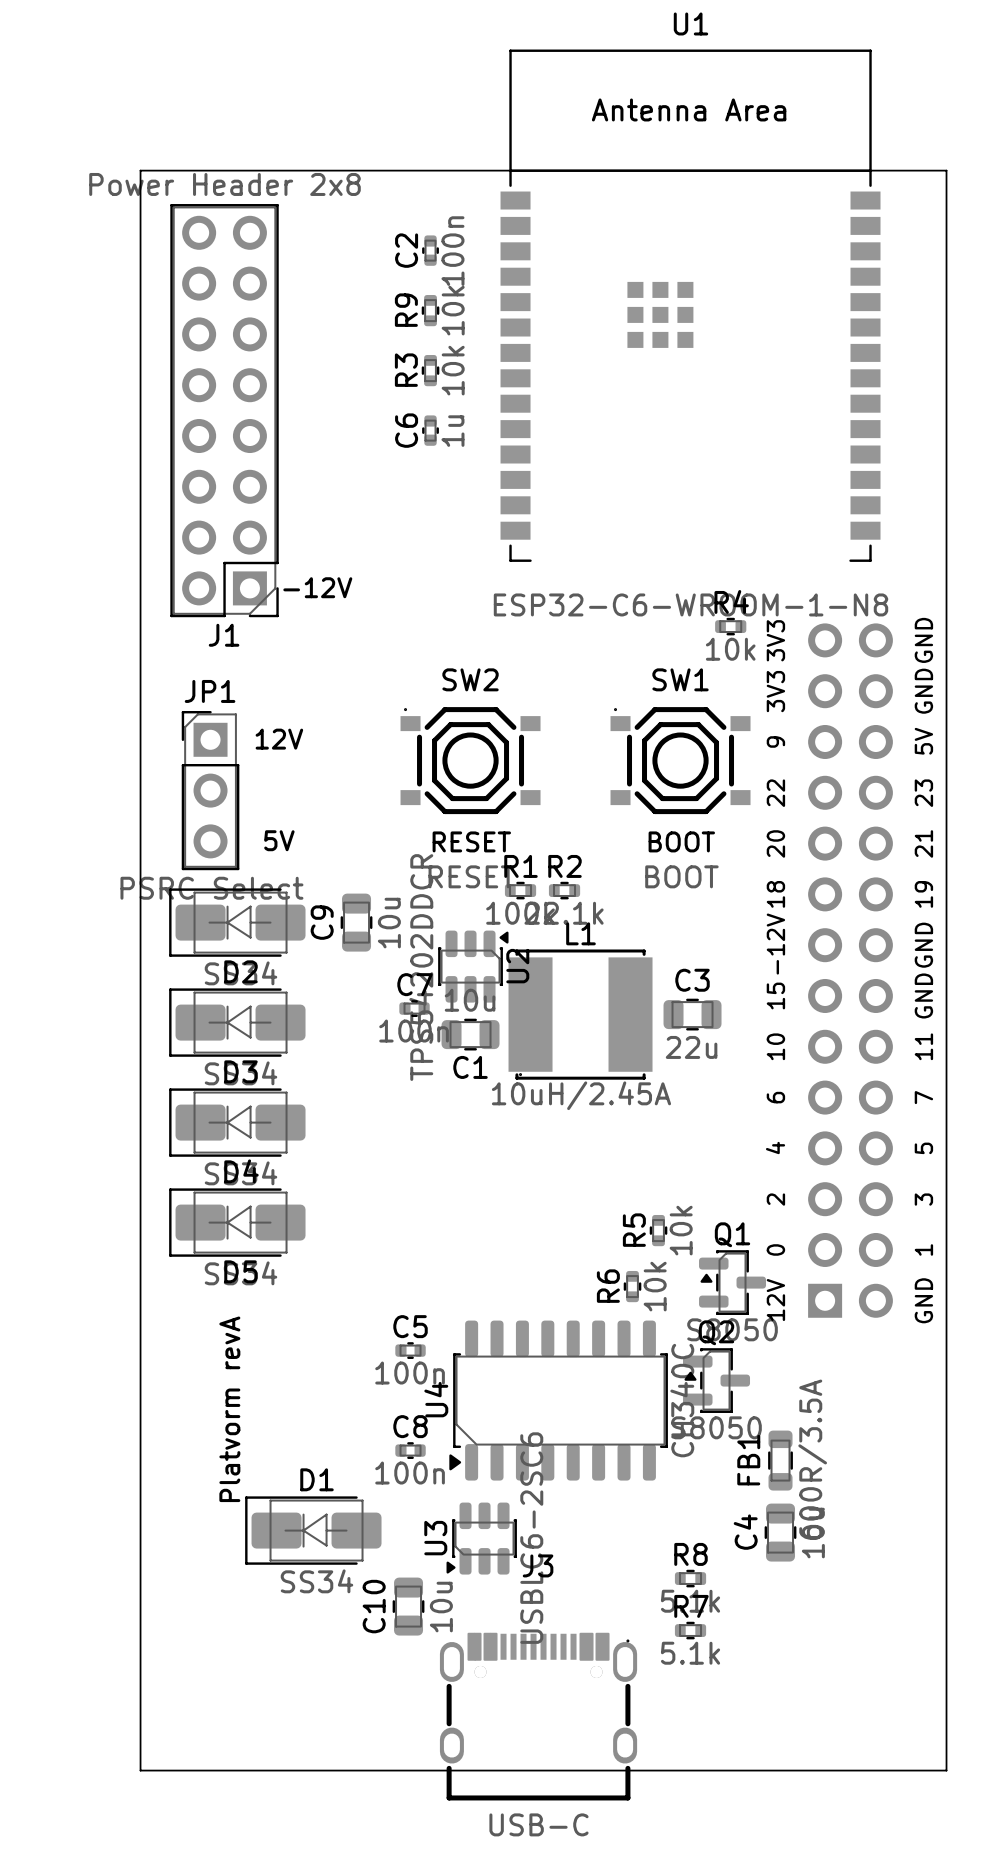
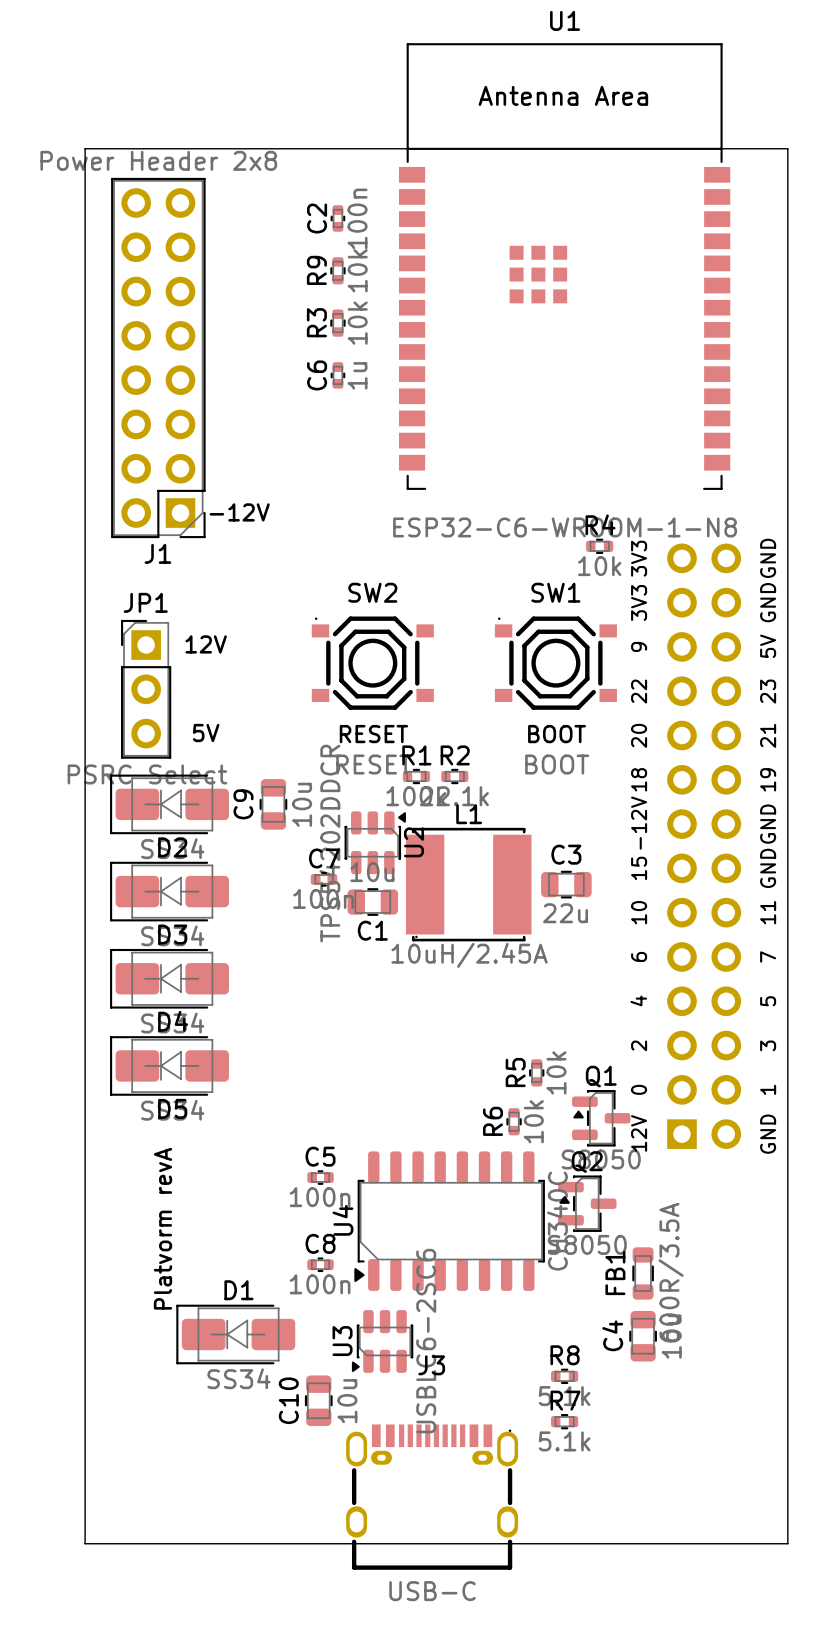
J3 footprint: [439, 1632, 638, 1801] -> [346, 1424, 519, 1570]

